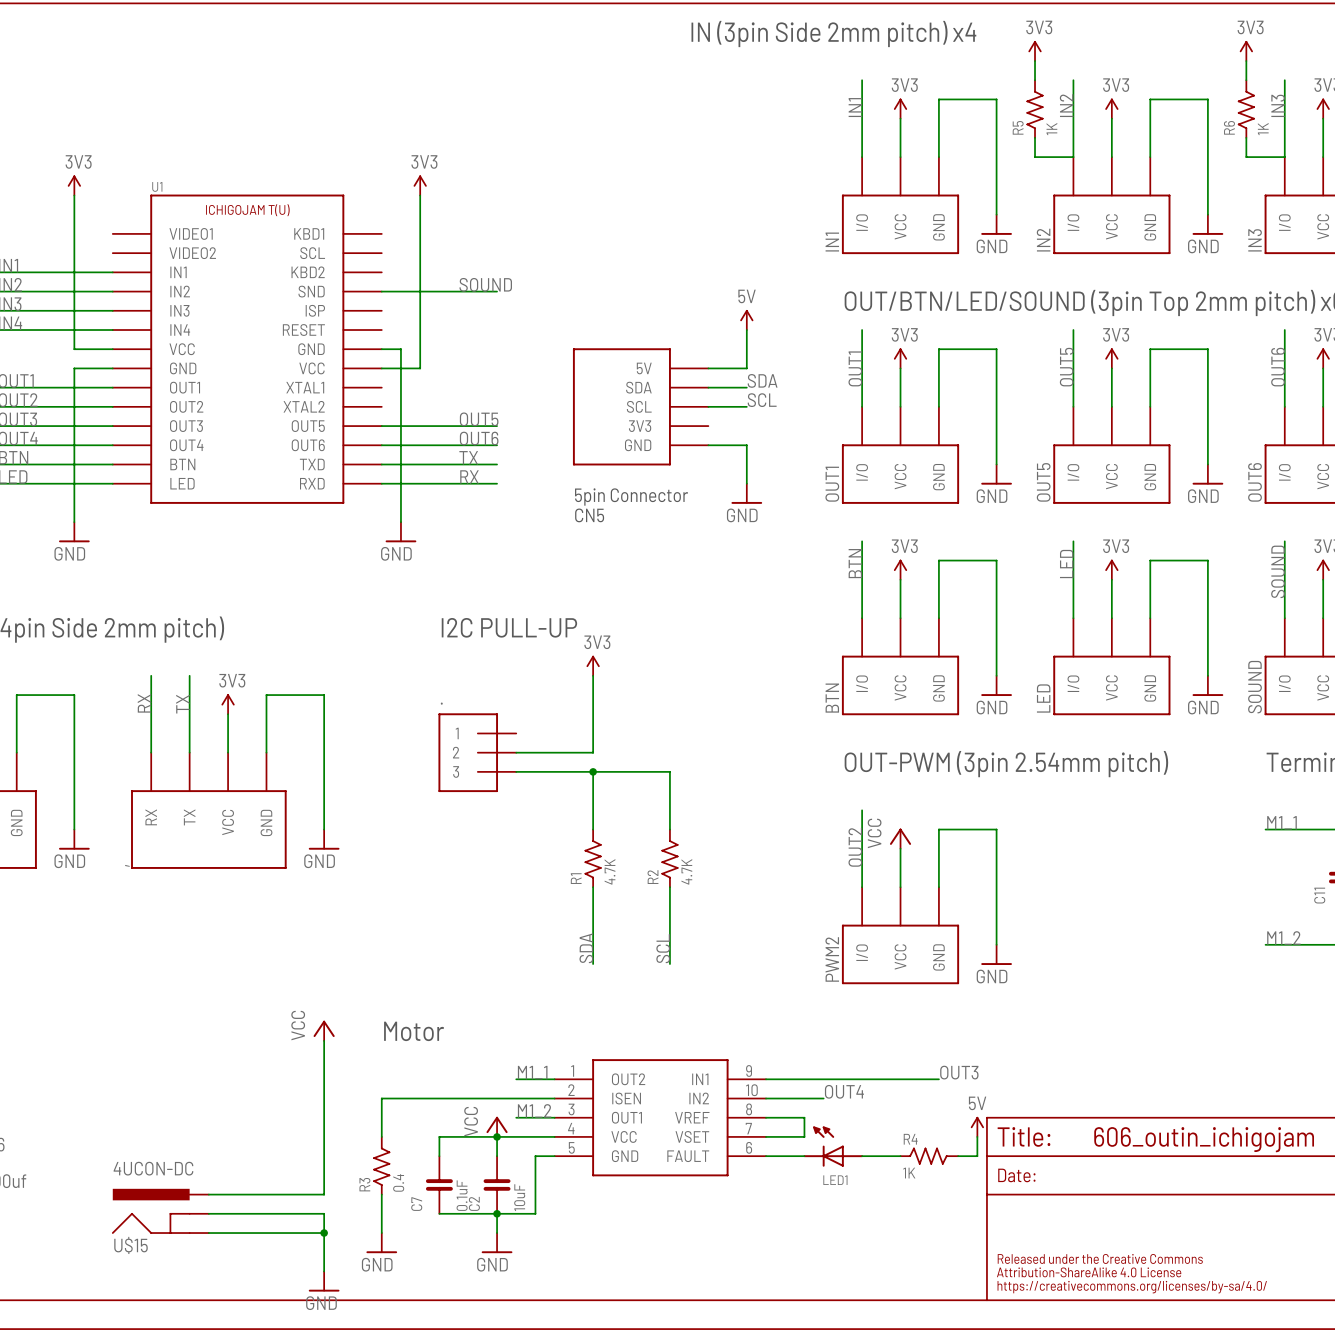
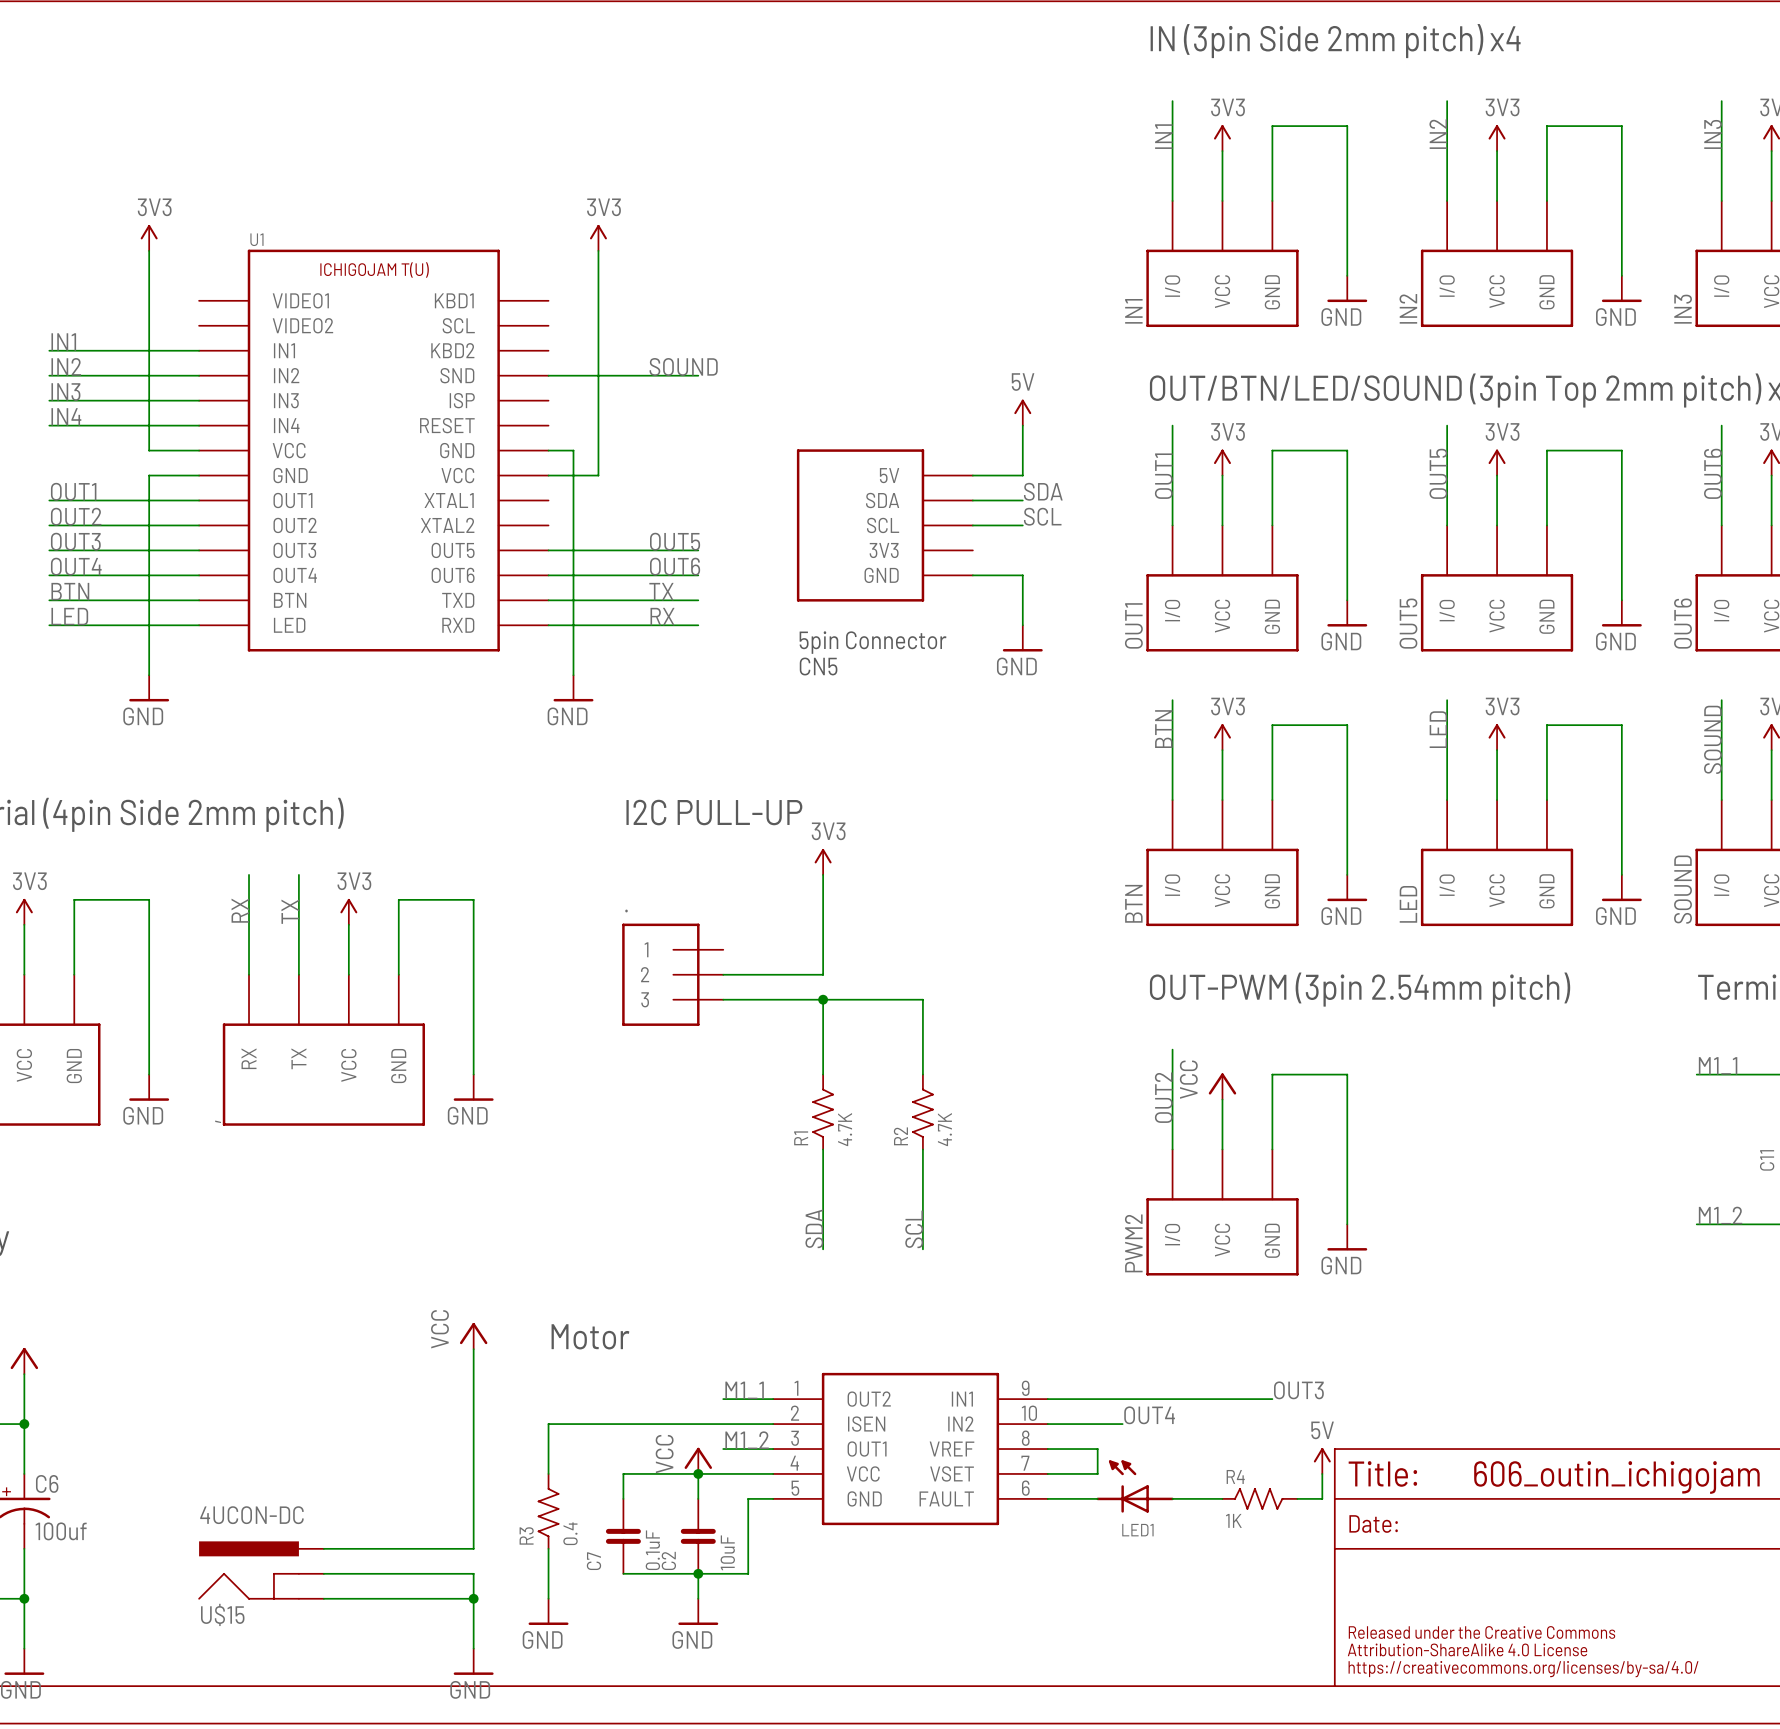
text position: IN (3pin Side 2mm pitch) x4 (833, 34) -> IN (3pin Side 2mm pitch) x4 (1335, 41)
power symbol: 3V3 (1035, 51) -> none
power symbol: 3V3 (1246, 51) -> none
wire: (1035, 61) (1035, 80) -> none
wire: (1246, 61) (1246, 80) -> none
R5: 1K (1035, 109) -> none
R6: 1K (1246, 109) -> none
wire: (1035, 137) (1035, 157) (1073, 157) -> none
wire: (1246, 137) (1246, 157) (1284, 157) -> none

